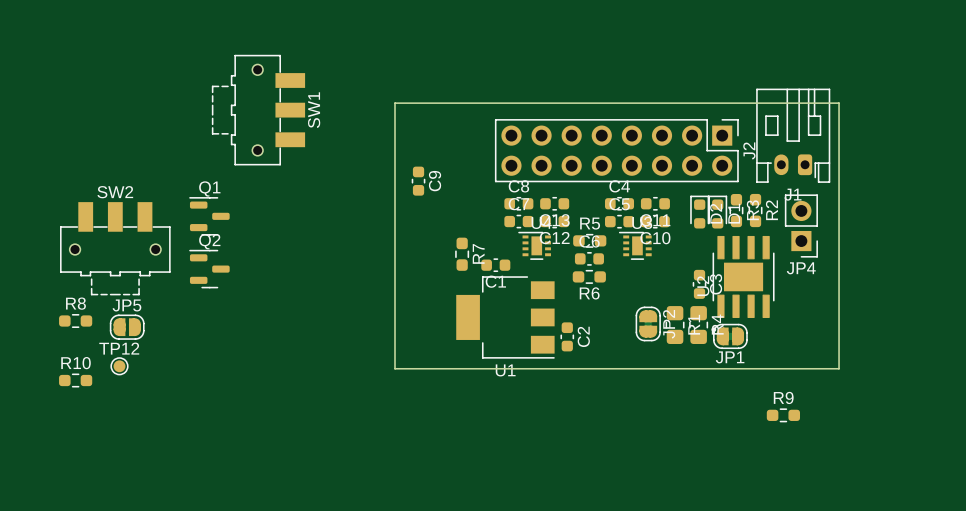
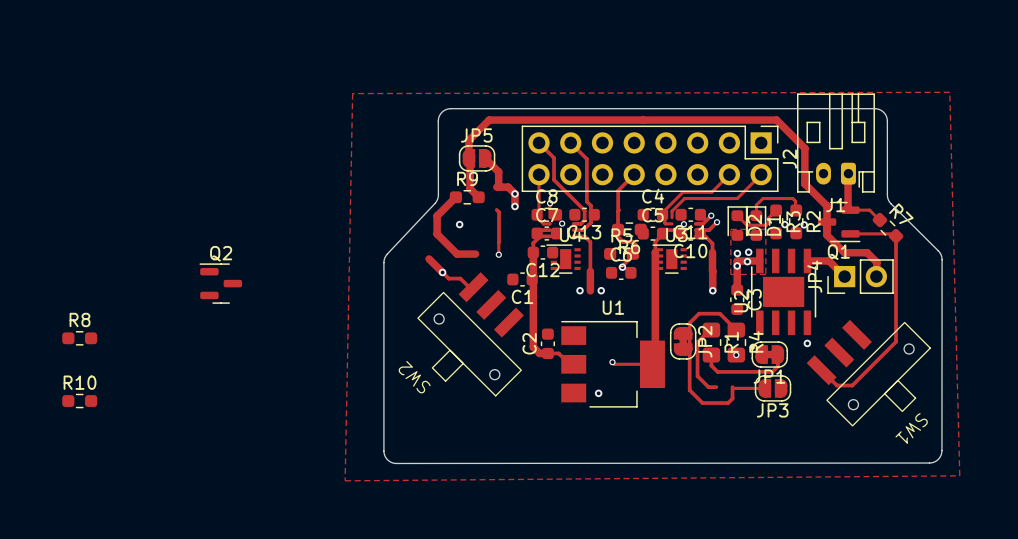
SW1 footprint: [211, 54, 306, 166] -> [806, 319, 931, 427]
zone outline: none -> (949, 92) (959, 475) (345, 480) (352, 93) (949, 92)
board edge: (427, 103) (395, 103) (395, 368) (839, 368) (839, 103) (830, 103) -> (450, 108) (441, 112) (438, 119) (437, 199) (387, 254) (384, 261) (383, 450) (387, 459) (395, 463) (929, 463) (937, 460) (941, 450) (941, 257) (939, 251) (888, 199) (887, 119) (883, 112) (874, 108)
SW1 name position: SW1 (314, 110) -> SW1 (911, 428)
track: none -> (539, 142) (554, 157) (554, 179) (584, 210) (584, 220) (580, 223) (573, 223)
track: none -> (570, 142) (586, 159) (586, 201) (590, 205) (590, 222) (583, 230) (573, 230)
track: none -> (485, 158) (498, 171) (498, 187)
track: none -> (539, 174) (539, 219) (543, 223) (549, 223)
track: none -> (634, 174) (618, 190) (618, 210)
track: none -> (729, 174) (711, 192) (682, 192) (664, 210) (664, 223) (672, 223)
track: none -> (761, 174) (737, 198) (684, 198) (672, 211) (672, 217)
track: none -> (848, 174) (848, 207) (850, 210) (869, 210) (880, 221) (883, 221)
track: none -> (496, 187) (508, 187) (514, 193) (514, 206)
C9: (418, 181) -> none
via: none -> (514, 193)
track: none -> (455, 197) (437, 216) (437, 234) (457, 254) (475, 254)
track: none -> (478, 197) (470, 188) (468, 140) (489, 120) (776, 120) (804, 148) (804, 183) (826, 206) (826, 235) (844, 252) (867, 252) (876, 262) (876, 273)
SW2 name position: SW2 (115, 192) -> SW2 (414, 377)
via: none -> (550, 203)
track: none -> (549, 203) (549, 217)
via: none -> (514, 206)
track: none -> (496, 209) (498, 212) (498, 254)
track: none -> (619, 210) (618, 236) (623, 241) (632, 241) (635, 244) (635, 252) (622, 267)
track: none -> (776, 210) (768, 218) (766, 225) (746, 225) (737, 215)
track: none -> (795, 210) (795, 201) (792, 198) (763, 198) (756, 205) (756, 215)
SW2 footprint: [60, 202, 171, 296] -> [417, 272, 524, 397]
track: none -> (711, 215) (703, 223) (695, 223)
via: none -> (711, 215)
track: none -> (717, 222) (709, 230) (695, 230)
via: none -> (717, 222)
via: none -> (562, 223)
via: none -> (683, 224)
via: none -> (459, 224)
via: none -> (784, 224)
via: none -> (804, 224)
Q1 rotation: 0° (209, 216) -> 180° (839, 222)
Q1 position: (209, 216) -> (839, 222)
zone outline: none -> (765, 229) (730, 229) (730, 274) (765, 274) (765, 229)
track: none -> (538, 230) (549, 230)
track: none -> (672, 230) (660, 230) (660, 236) (655, 241) (655, 252)
C12 position: (554, 221) -> (542, 252)
track: none -> (857, 233) (896, 233) (899, 237)
track: none -> (549, 236) (540, 236) (533, 243) (533, 347) (539, 353) (558, 353) (569, 364) (573, 364)
track: none -> (573, 236) (584, 236) (590, 242) (590, 290)
track: none -> (695, 236) (705, 236) (712, 243) (712, 290)
track: none -> (896, 236) (896, 341) (852, 385) (836, 385) (821, 370)
JP4 rotation: 0° (801, 225) -> 90° clockwise (860, 276)
JP4 position: (801, 225) -> (860, 276)
track: none -> (655, 252) (655, 372)
via: none -> (748, 252)
via: none -> (737, 253)
via: none -> (498, 254)
track: none -> (429, 258) (448, 278) (460, 278) (469, 287) (473, 287)
track: none -> (737, 260) (759, 260)
track: none -> (737, 261) (736, 286)
track: none -> (807, 260) (829, 260) (844, 276)
via: none -> (747, 261)
via: none -> (737, 265)
via: none -> (622, 267)
R7 rotation: 0° (462, 254) -> 45° counterclockwise (887, 228)
R7 position: (462, 254) -> (887, 228)
via: none -> (442, 272)
via: none -> (580, 290)
via: none -> (601, 290)
via: none -> (712, 290)
R6 position: (589, 276) -> (629, 229)
track: none -> (711, 330) (697, 342) (697, 376) (708, 387) (716, 387)
track: none -> (736, 330) (719, 313) (699, 313) (689, 323) (689, 390) (702, 403) (728, 403) (732, 398) (732, 387) (761, 388)
U1 rotation: 0° (505, 317) -> 180° (613, 364)
U1 position: (505, 317) -> (613, 364)
via: none -> (807, 343)
JP5 position: (127, 327) -> (477, 158)
C2 position: (567, 336) -> (547, 343)
C2 name position: C2 (583, 336) -> C2 (529, 343)
via: none -> (736, 355)
track: none -> (777, 354) (777, 366) (772, 371) (717, 371) (711, 365) (711, 355)
track: none -> (612, 362) (614, 364) (652, 364)
via: none -> (612, 362)
TP12: (119, 366) -> none
JP3: none -> (773, 388)
via: none -> (598, 393)
R9 position: (783, 415) -> (467, 197)

